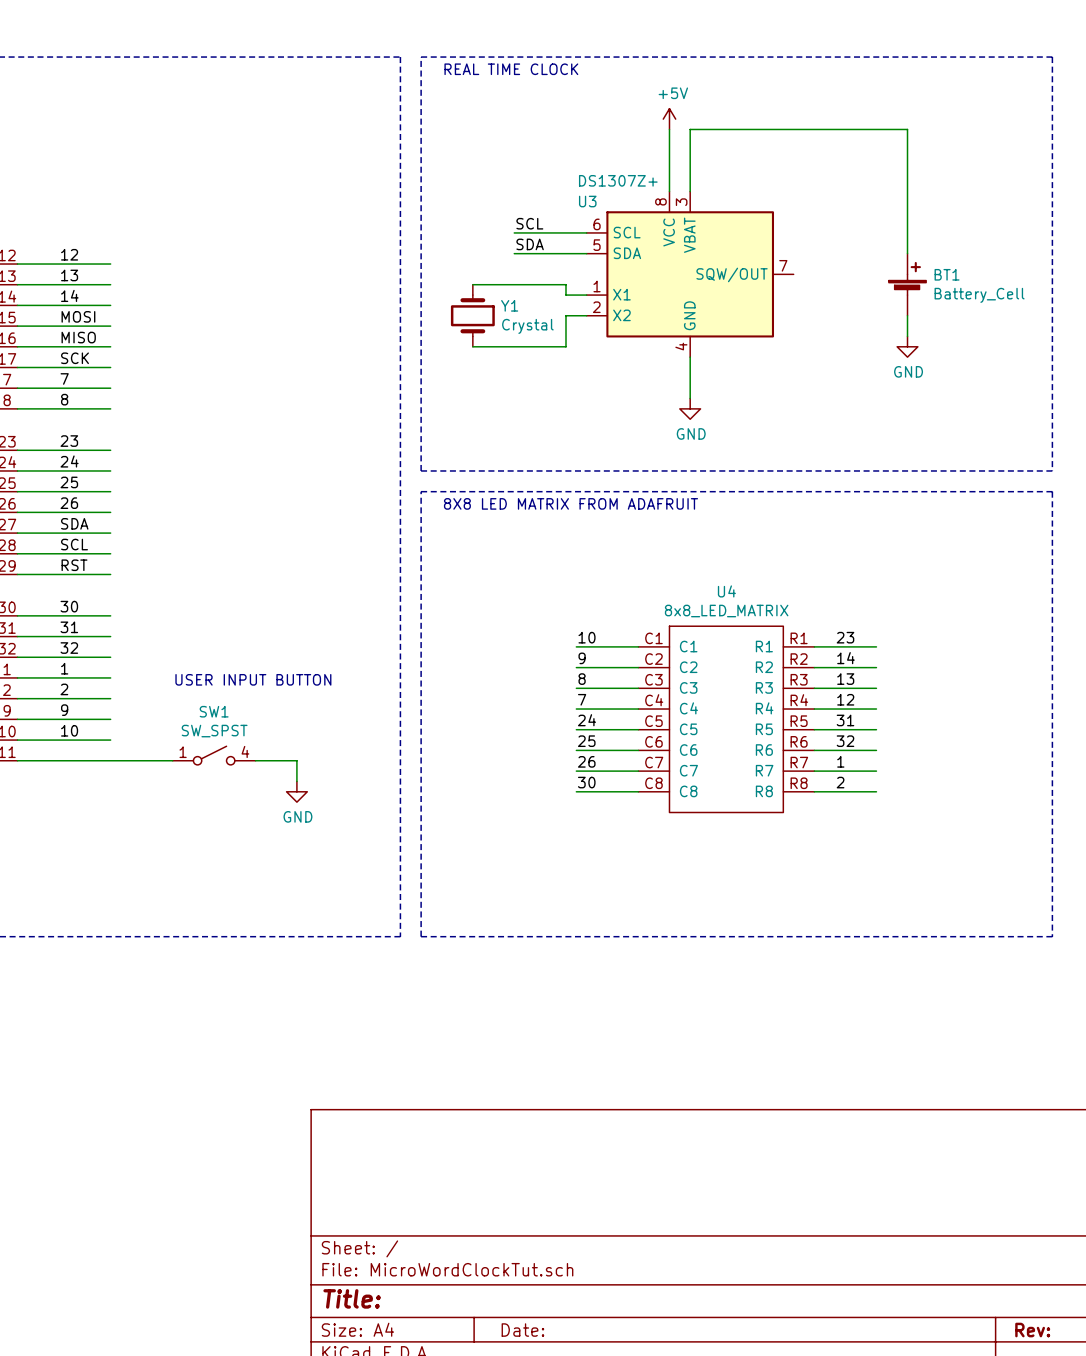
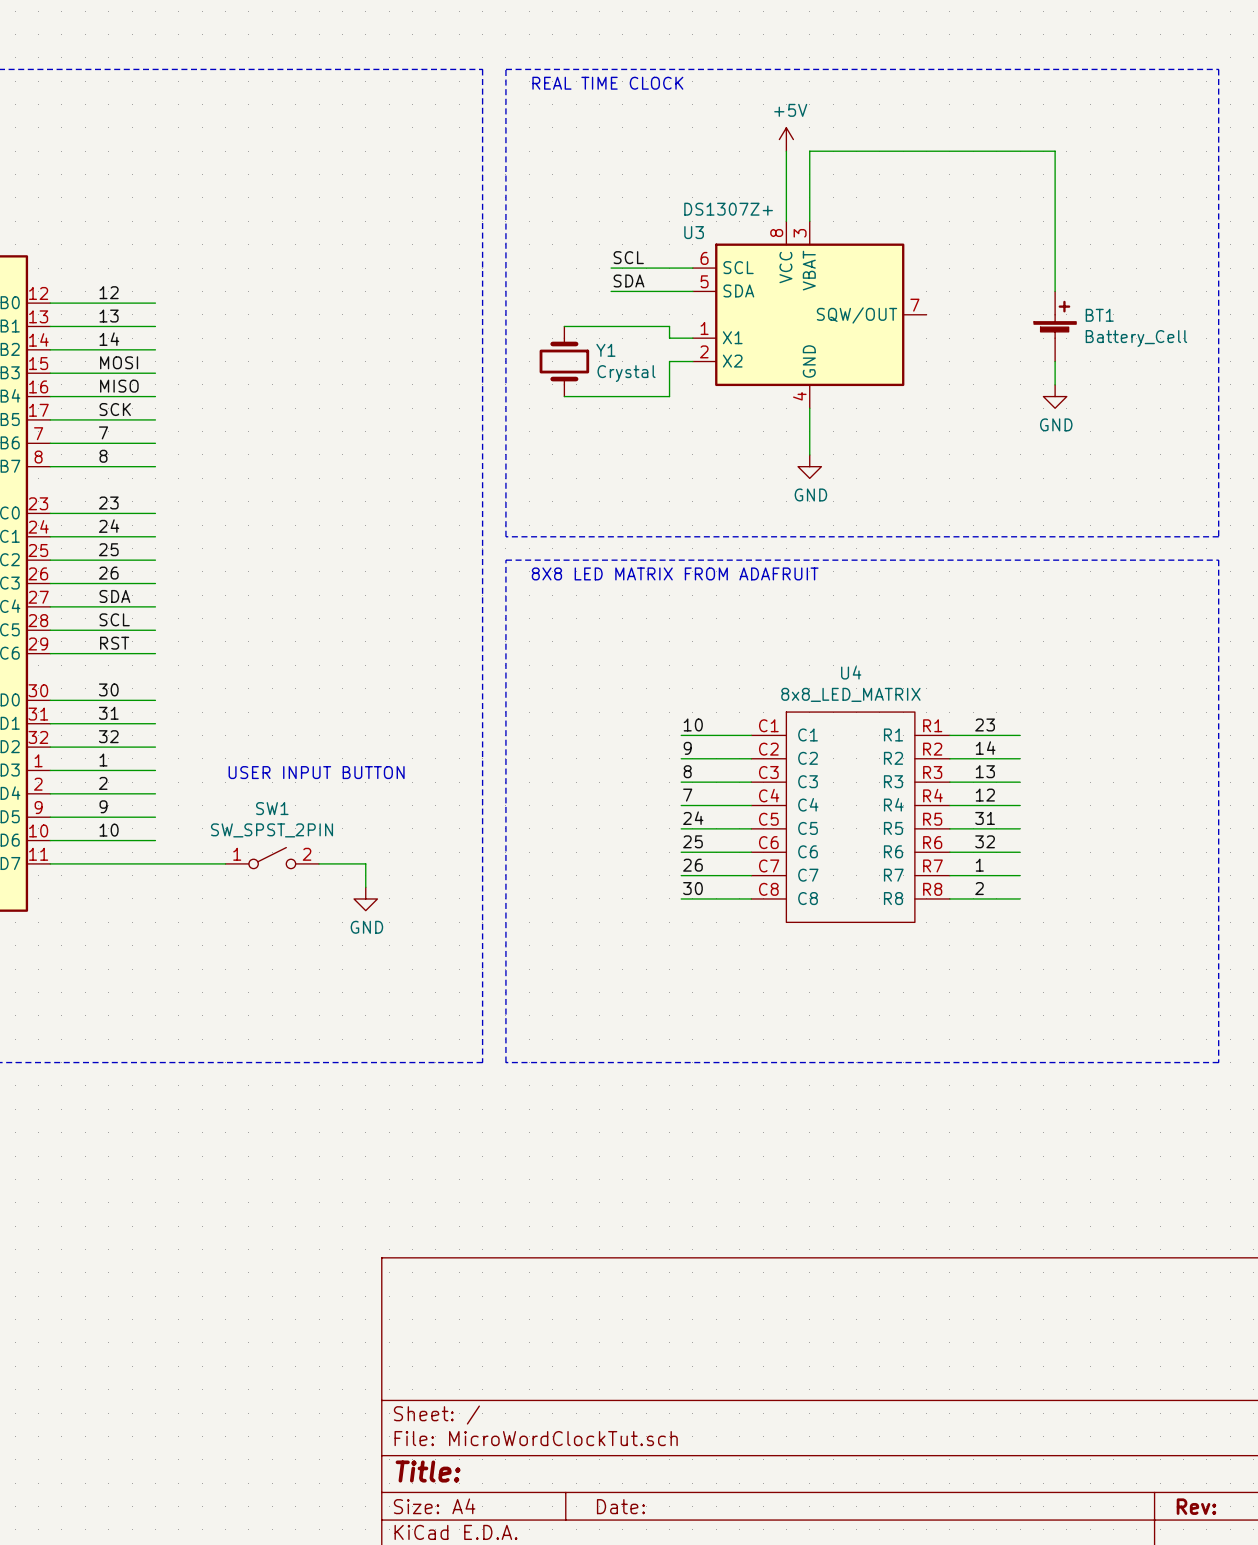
SW1 value: SW_SPST (214, 731) -> SW_SPST_2PIN (272, 830)
SW1 pin number: 4 (245, 751) -> 2 (307, 854)

